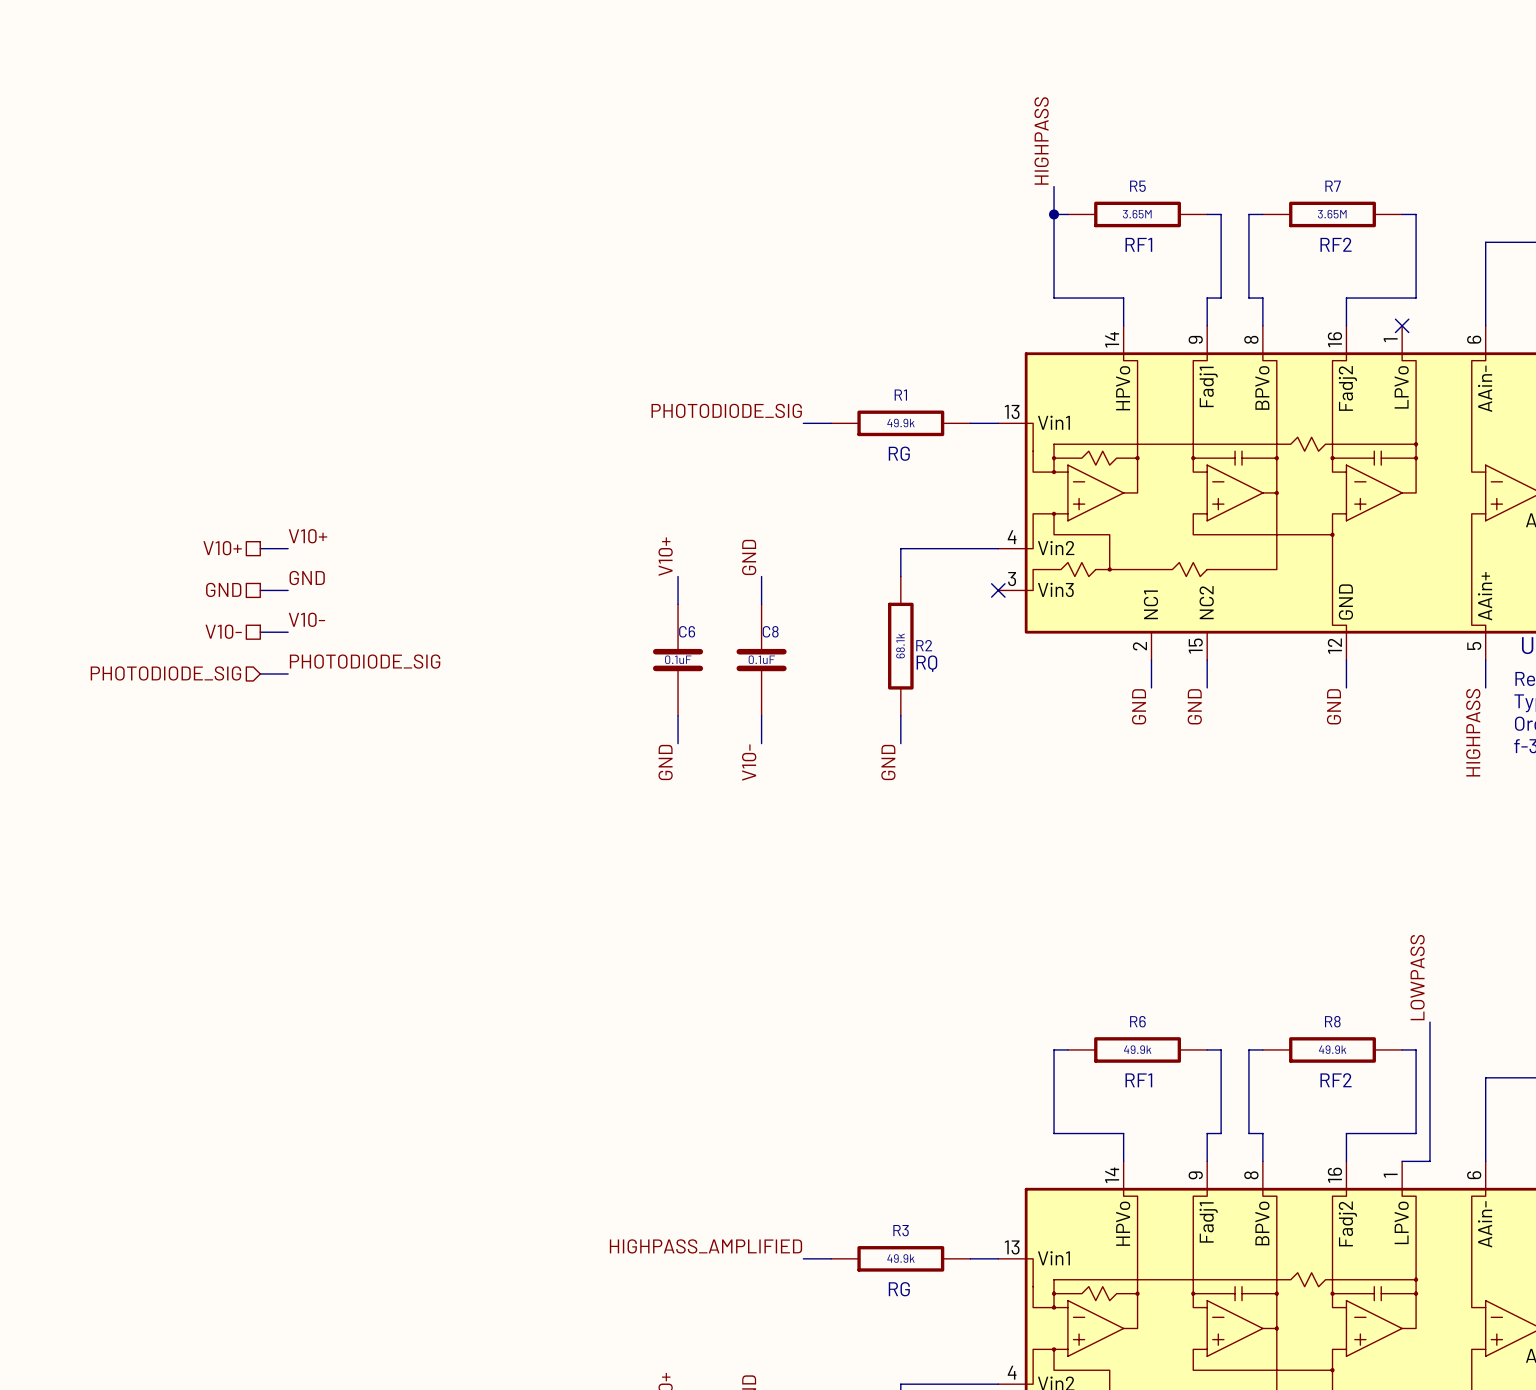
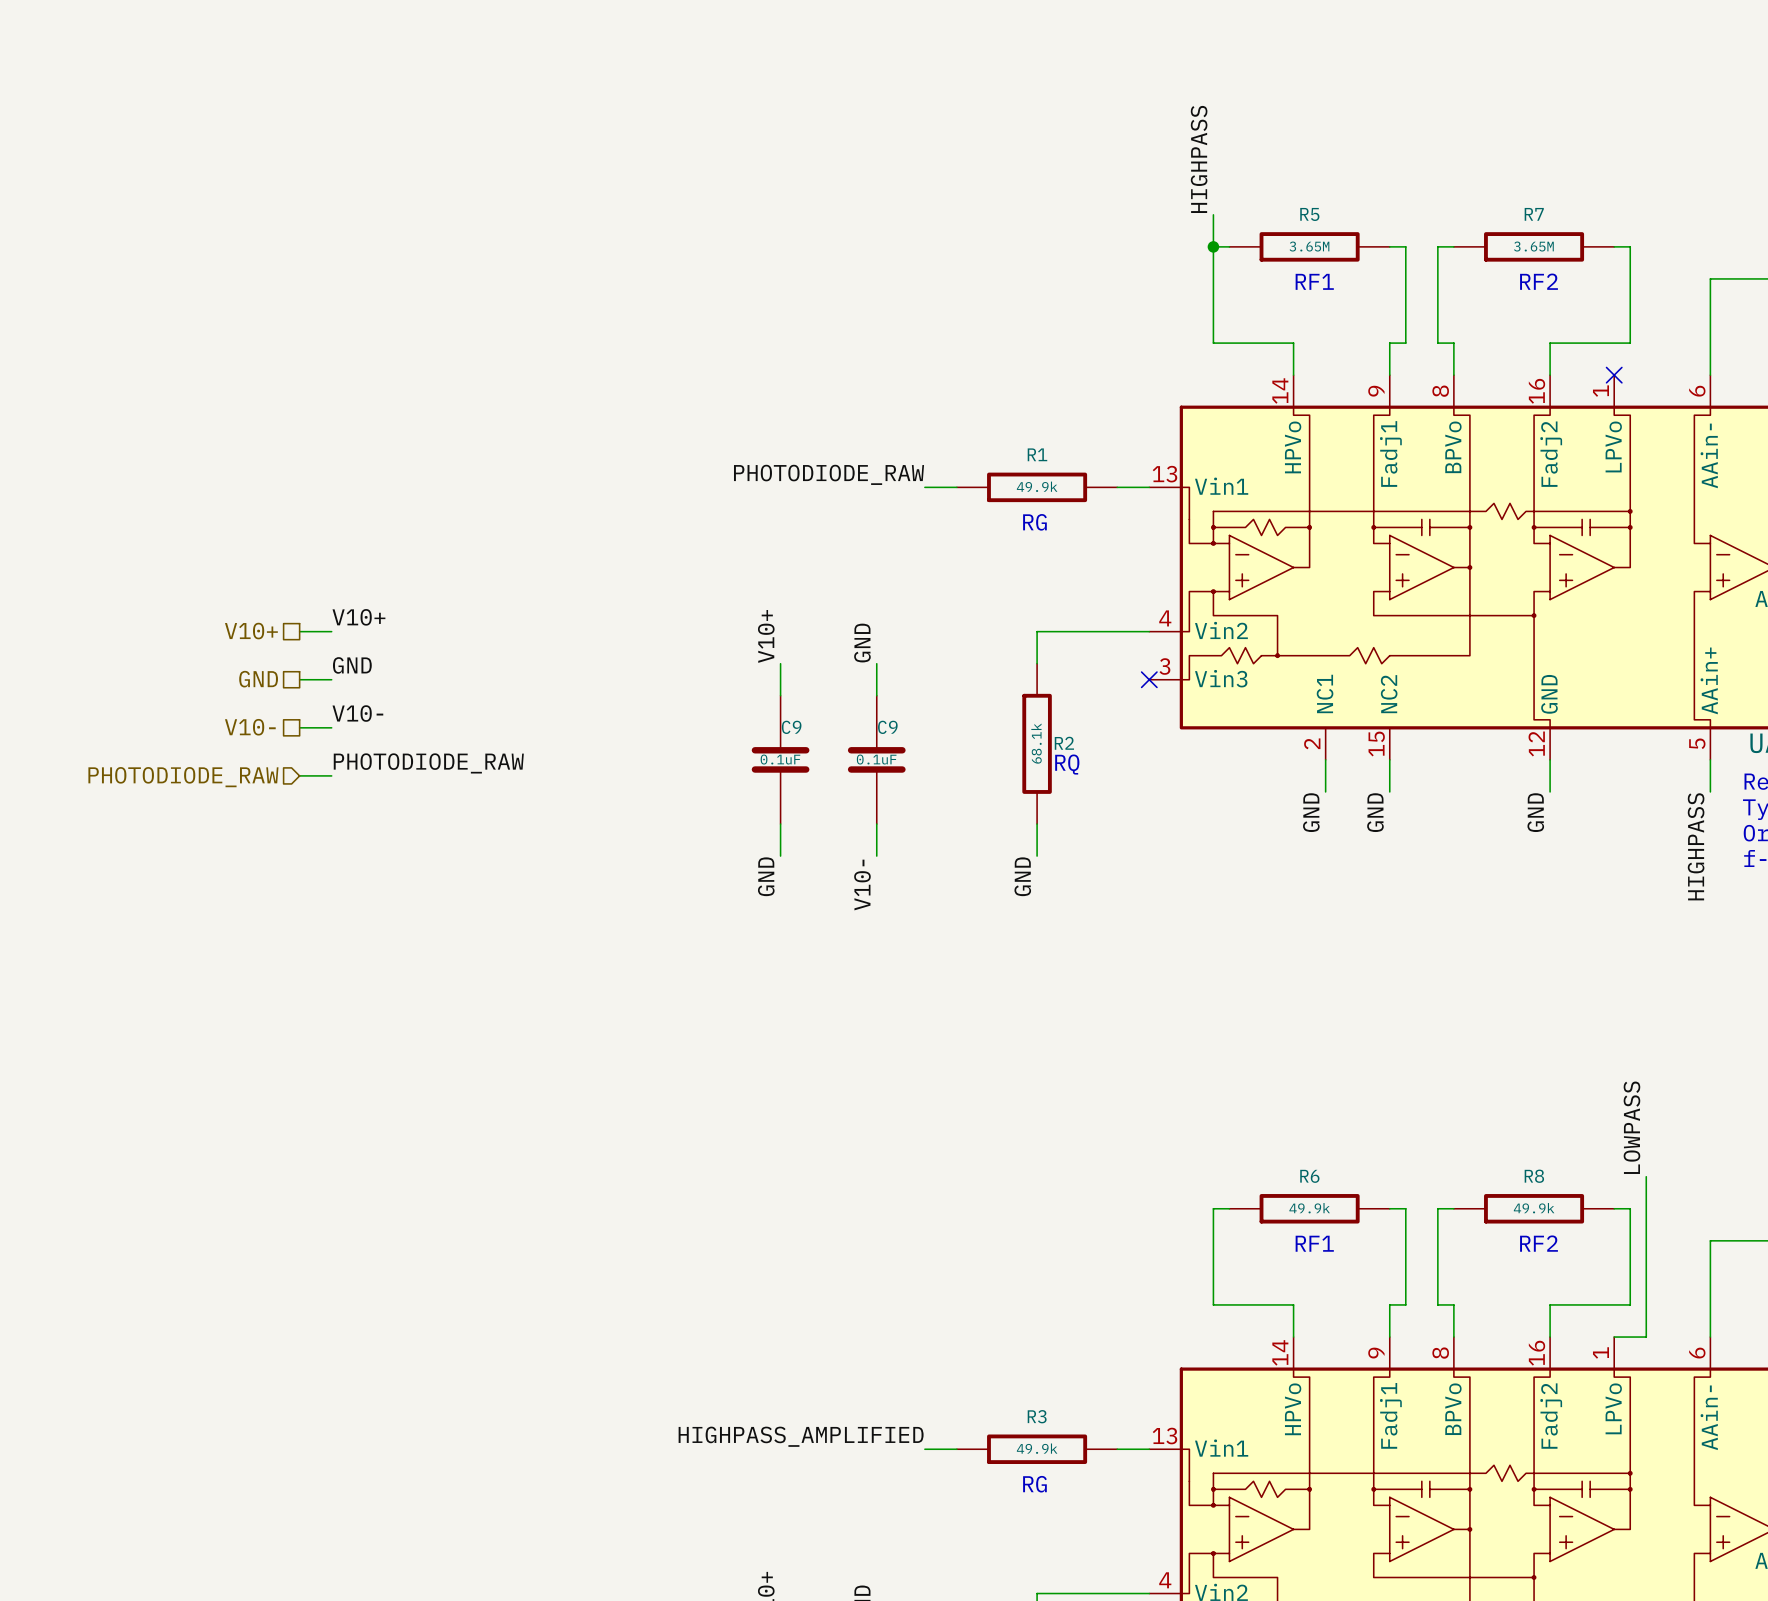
label: PHOTODIODE_SIG (726, 410) -> PHOTODIODE_RAW (829, 474)
C6 name: C6 (687, 631) -> C9 (791, 727)
C8 name: C8 (770, 631) -> C9 (887, 727)
label: PHOTODIODE_SIG (365, 661) -> PHOTODIODE_RAW (428, 763)
hierarchical label: PHOTODIODE_SIG (165, 673) -> PHOTODIODE_RAW (183, 777)

